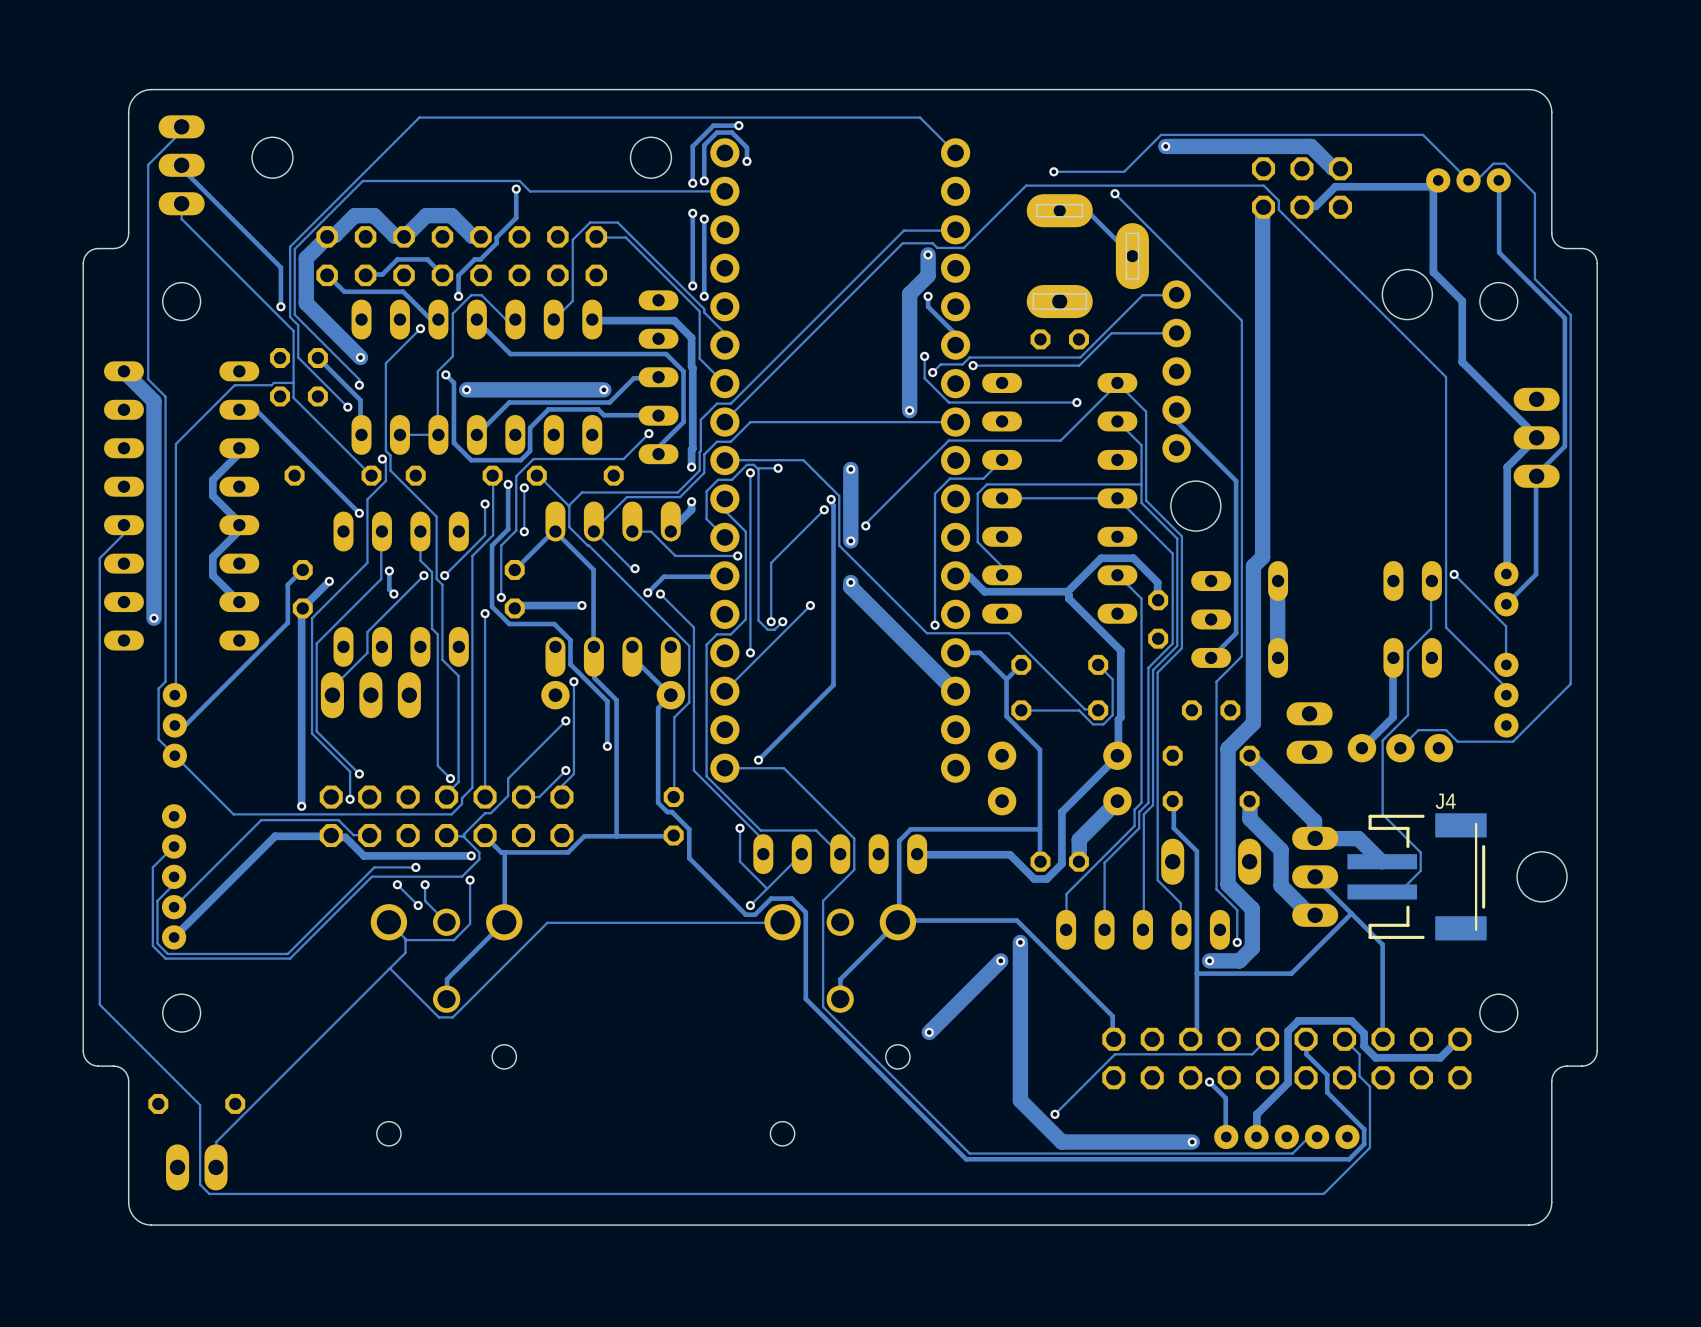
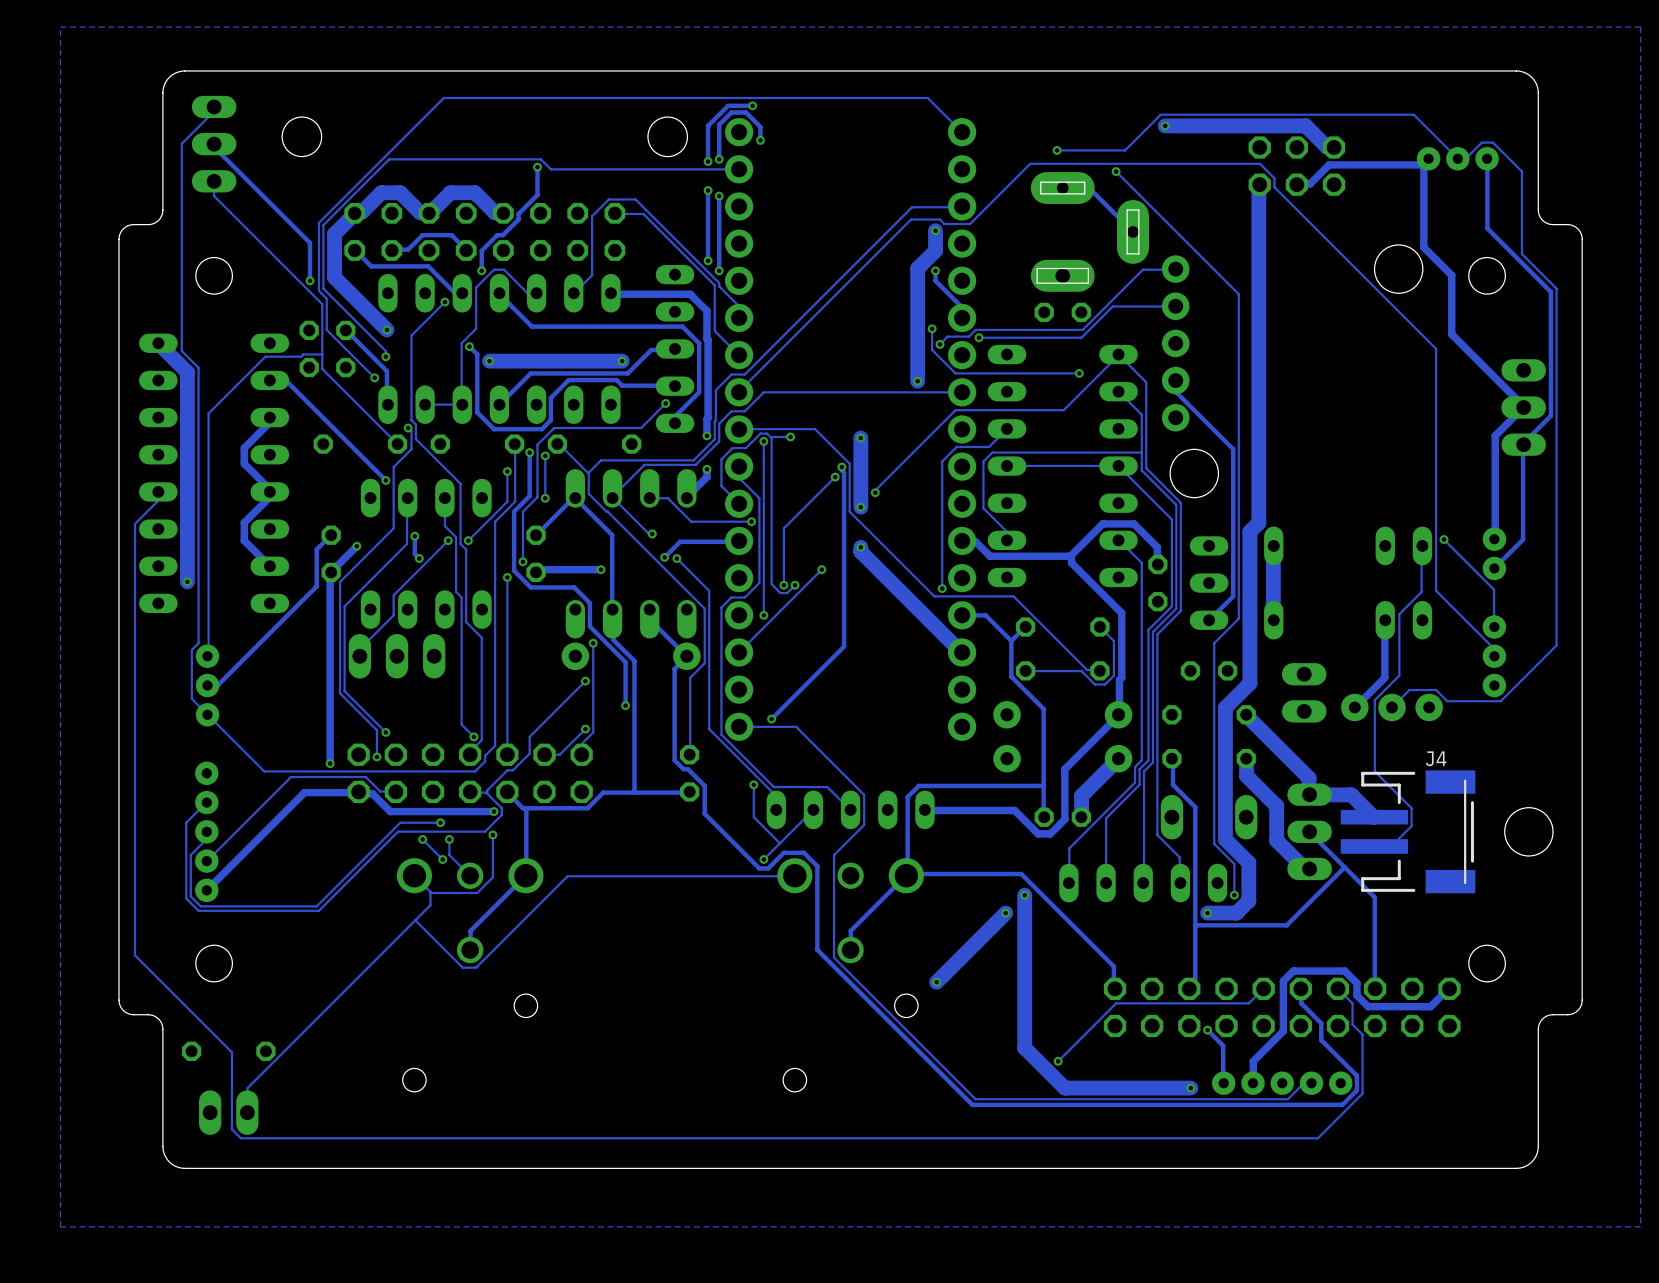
zone outline: none -> (1640, 27) (60, 27) (60, 1226) (1640, 1226) (1640, 27)

